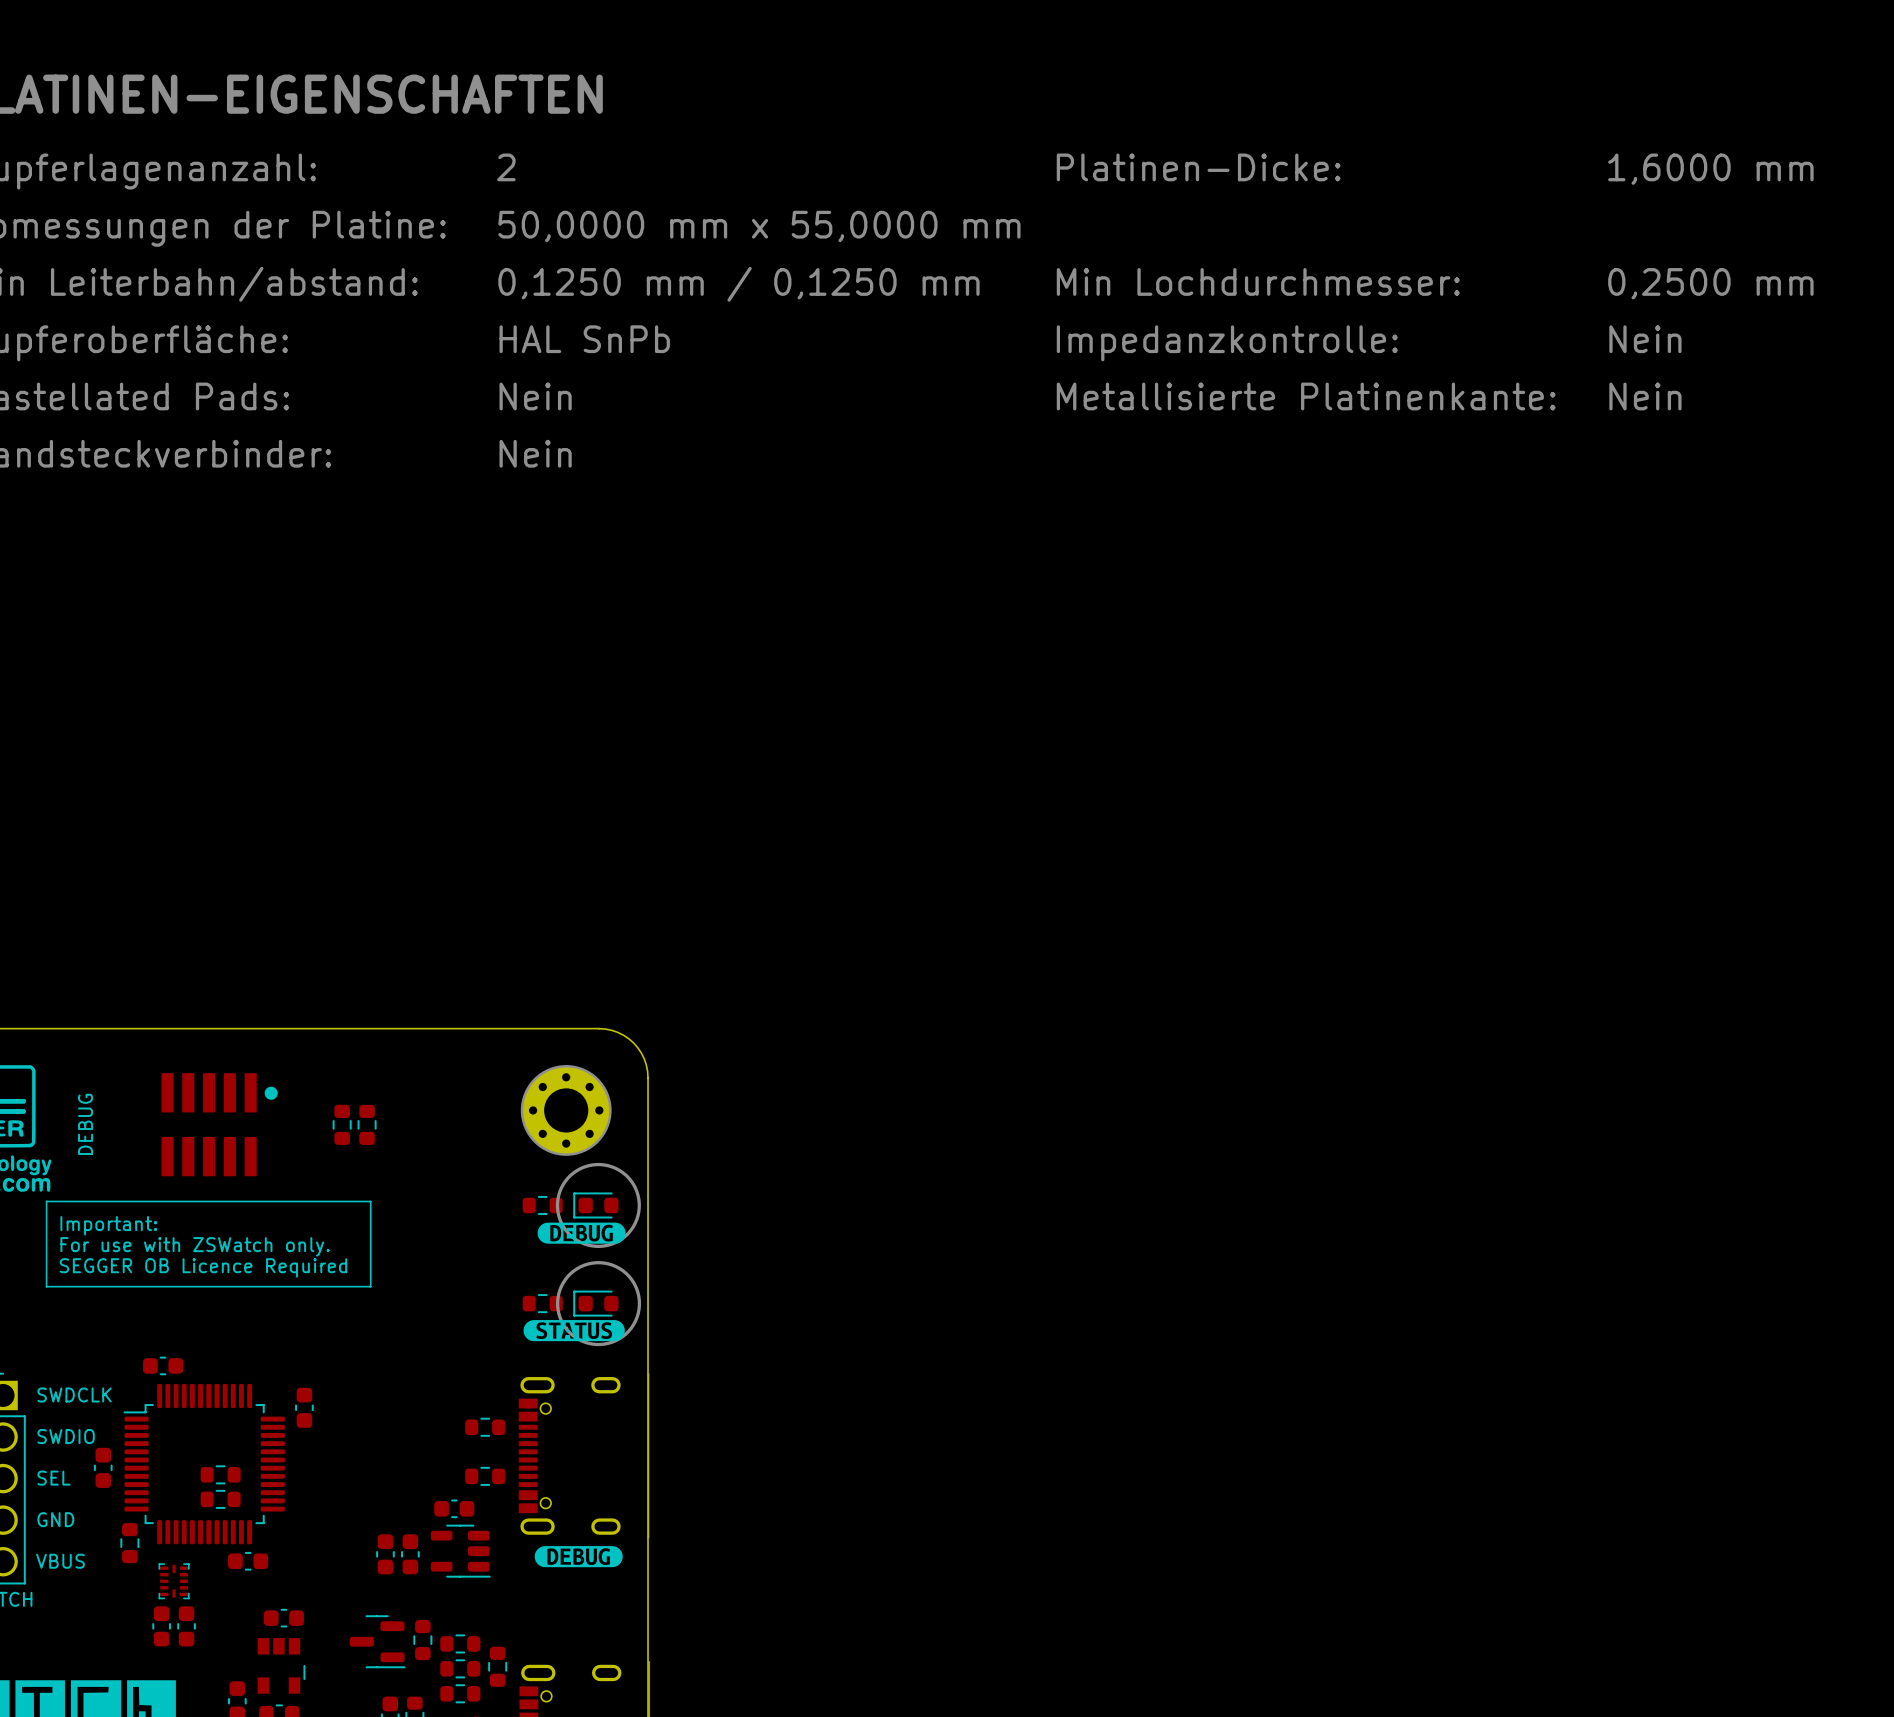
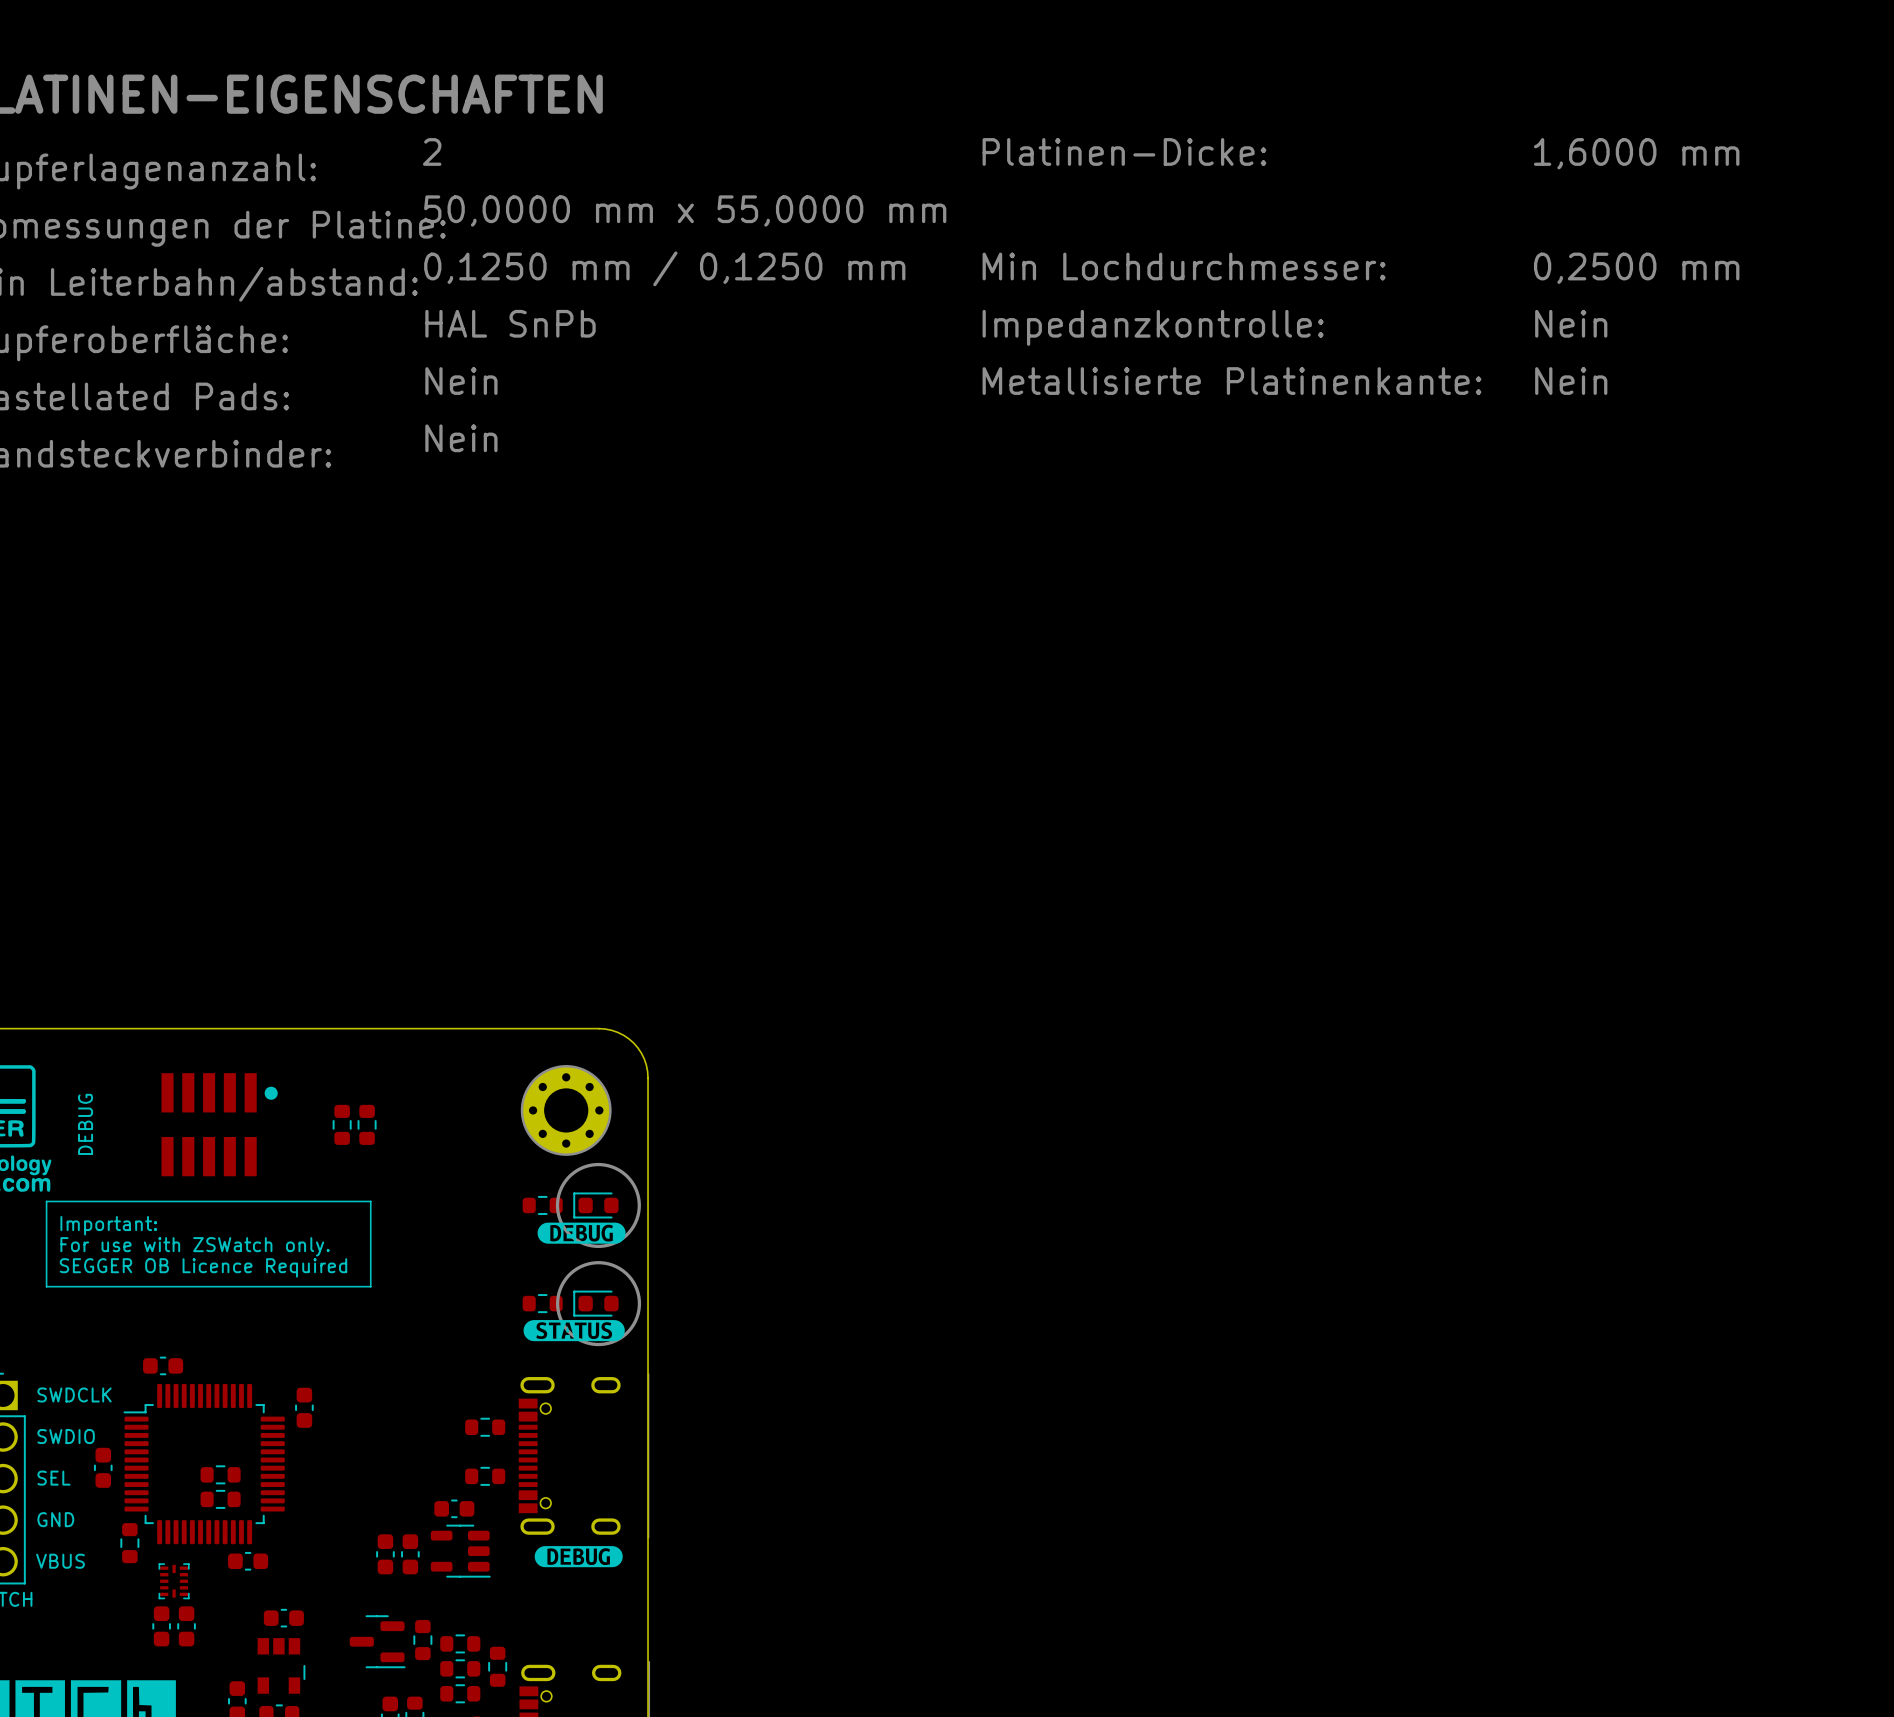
text position: 2 (506, 167) -> 2 (432, 151)
text position: Platinen-Dicke: (1198, 167) -> Platinen-Dicke: (1124, 151)
text position: 1,6000 mm (1710, 169) -> 1,6000 mm (1636, 153)
text position: 50,0000 mm x 55,0000 mm (759, 226) -> 50,0000 mm x 55,0000 mm (685, 210)
text position: Min Lochdurchmesser: (1258, 281) -> Min Lochdurchmesser: (1184, 266)
text position: 0,2500 mm (1710, 283) -> 0,2500 mm (1636, 268)
text position: 0,1250 mm / 0,1250 mm (738, 284) -> 0,1250 mm / 0,1250 mm (664, 268)
text: none -> Nein (1571, 323)
text position: HAL SnPb (584, 339) -> HAL SnPb (510, 323)
text: Nein (1645, 339) -> none
text position: Impedanzkontrolle: (1227, 343) -> Impedanzkontrolle: (1153, 327)
text: none -> Nein (461, 381)
text: none -> Nein (1571, 381)
text: Nein (535, 396) -> none
text position: Metallisierte Platinenkante: (1306, 396) -> Metallisierte Platinenkante: (1231, 381)
text: Nein (1645, 396) -> none
text: none -> Nein (461, 438)
text: Nein (535, 453) -> none

